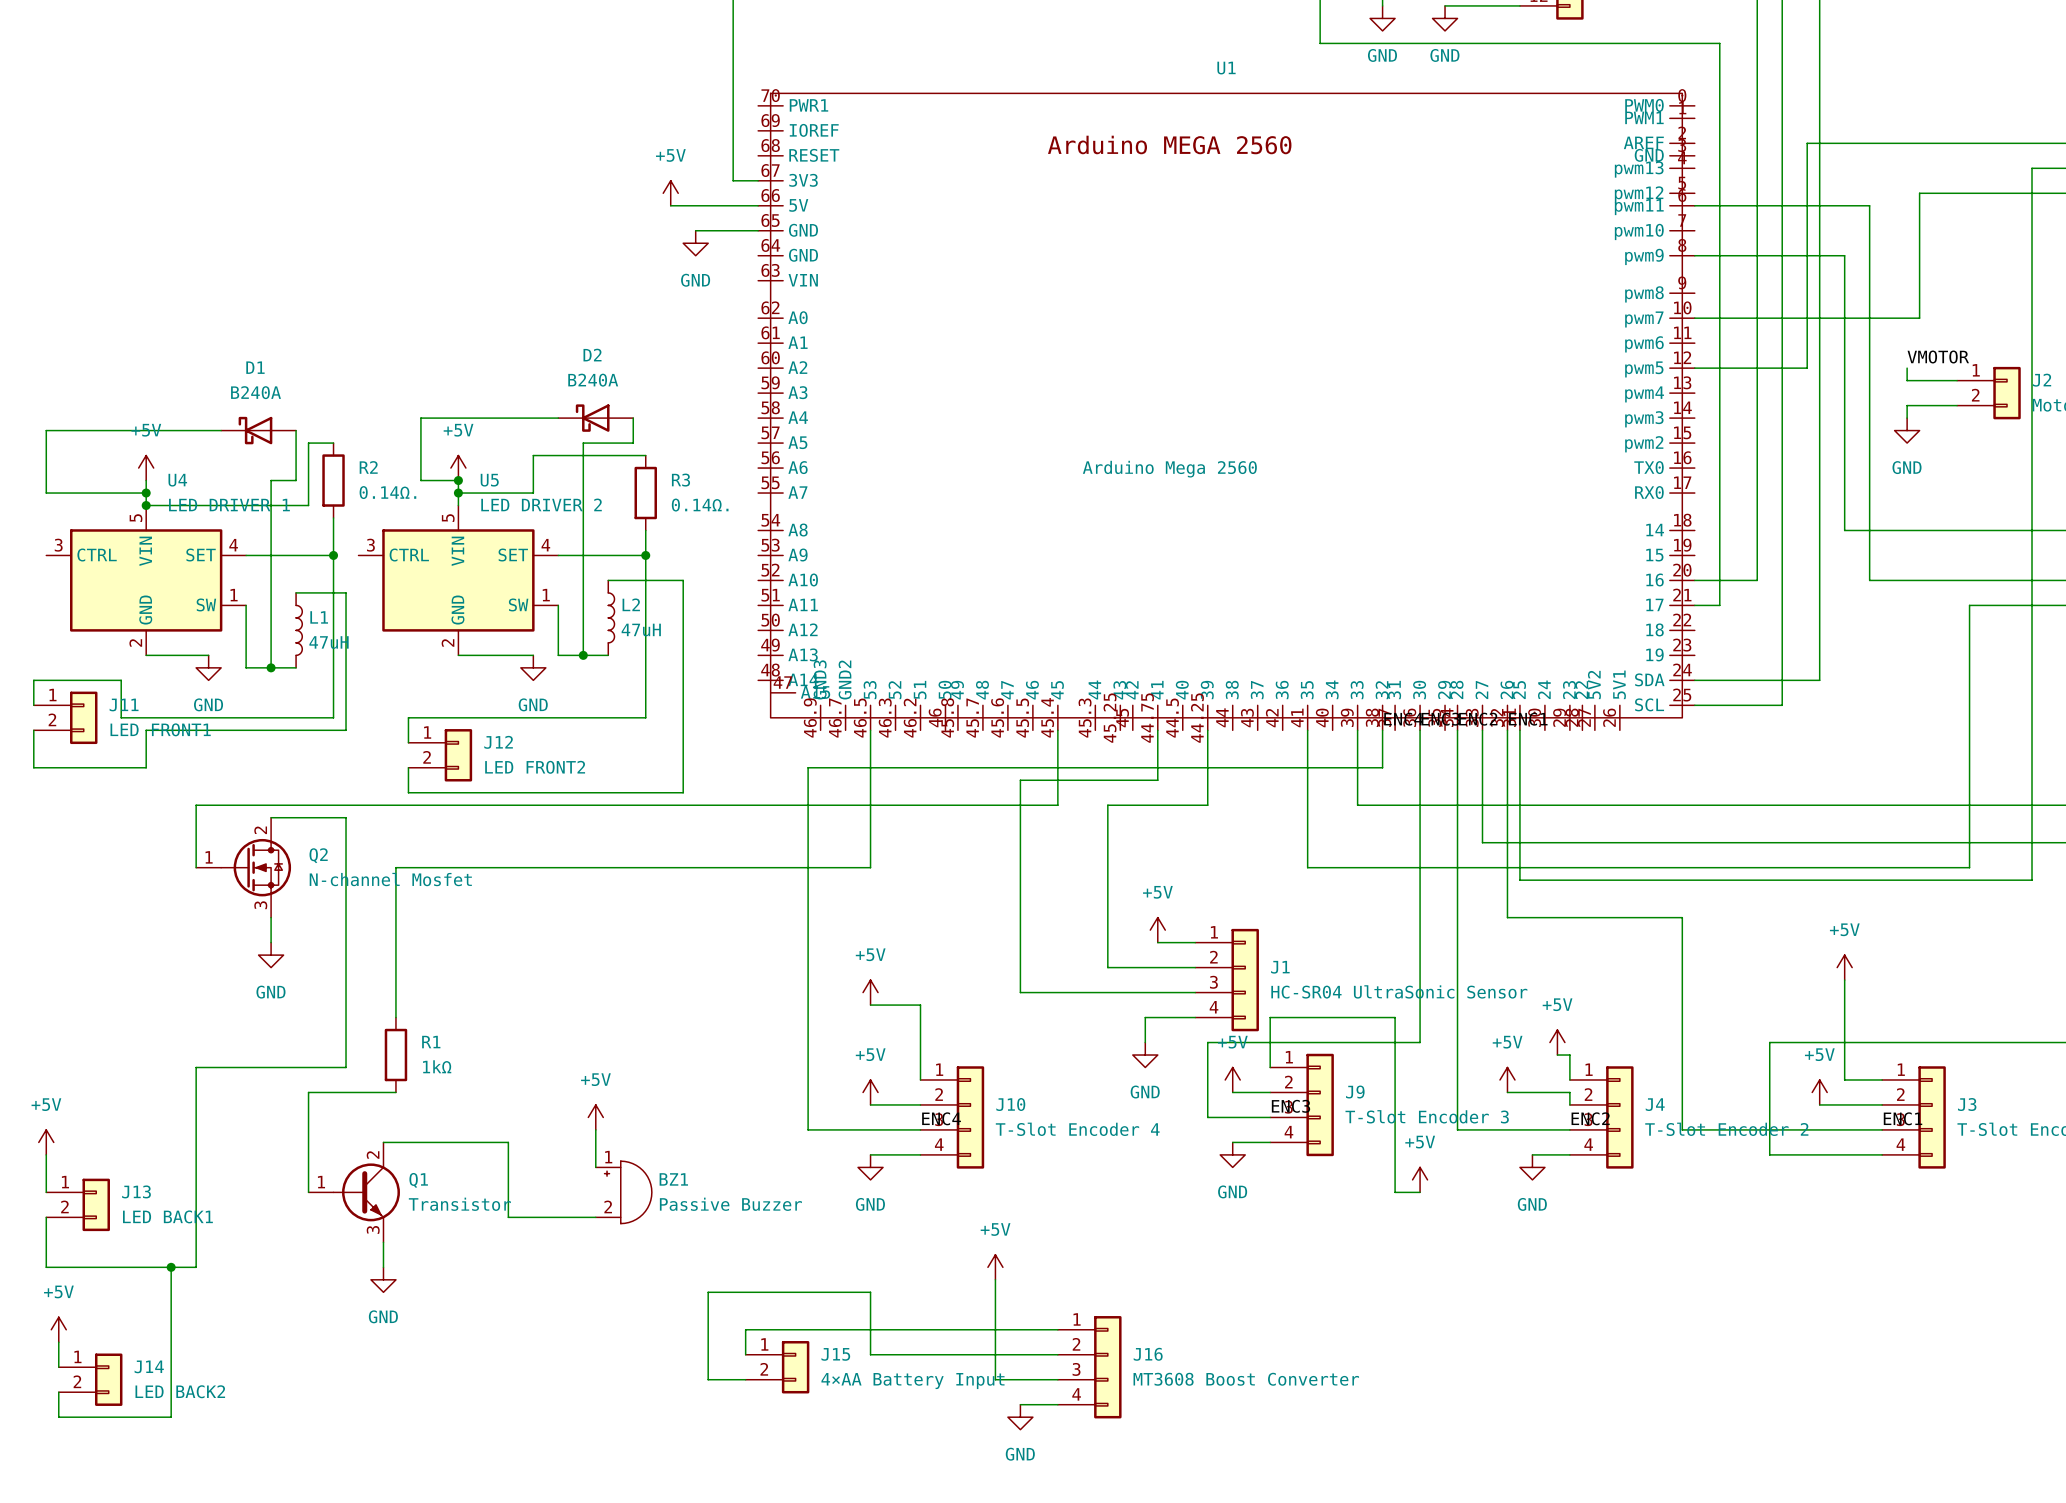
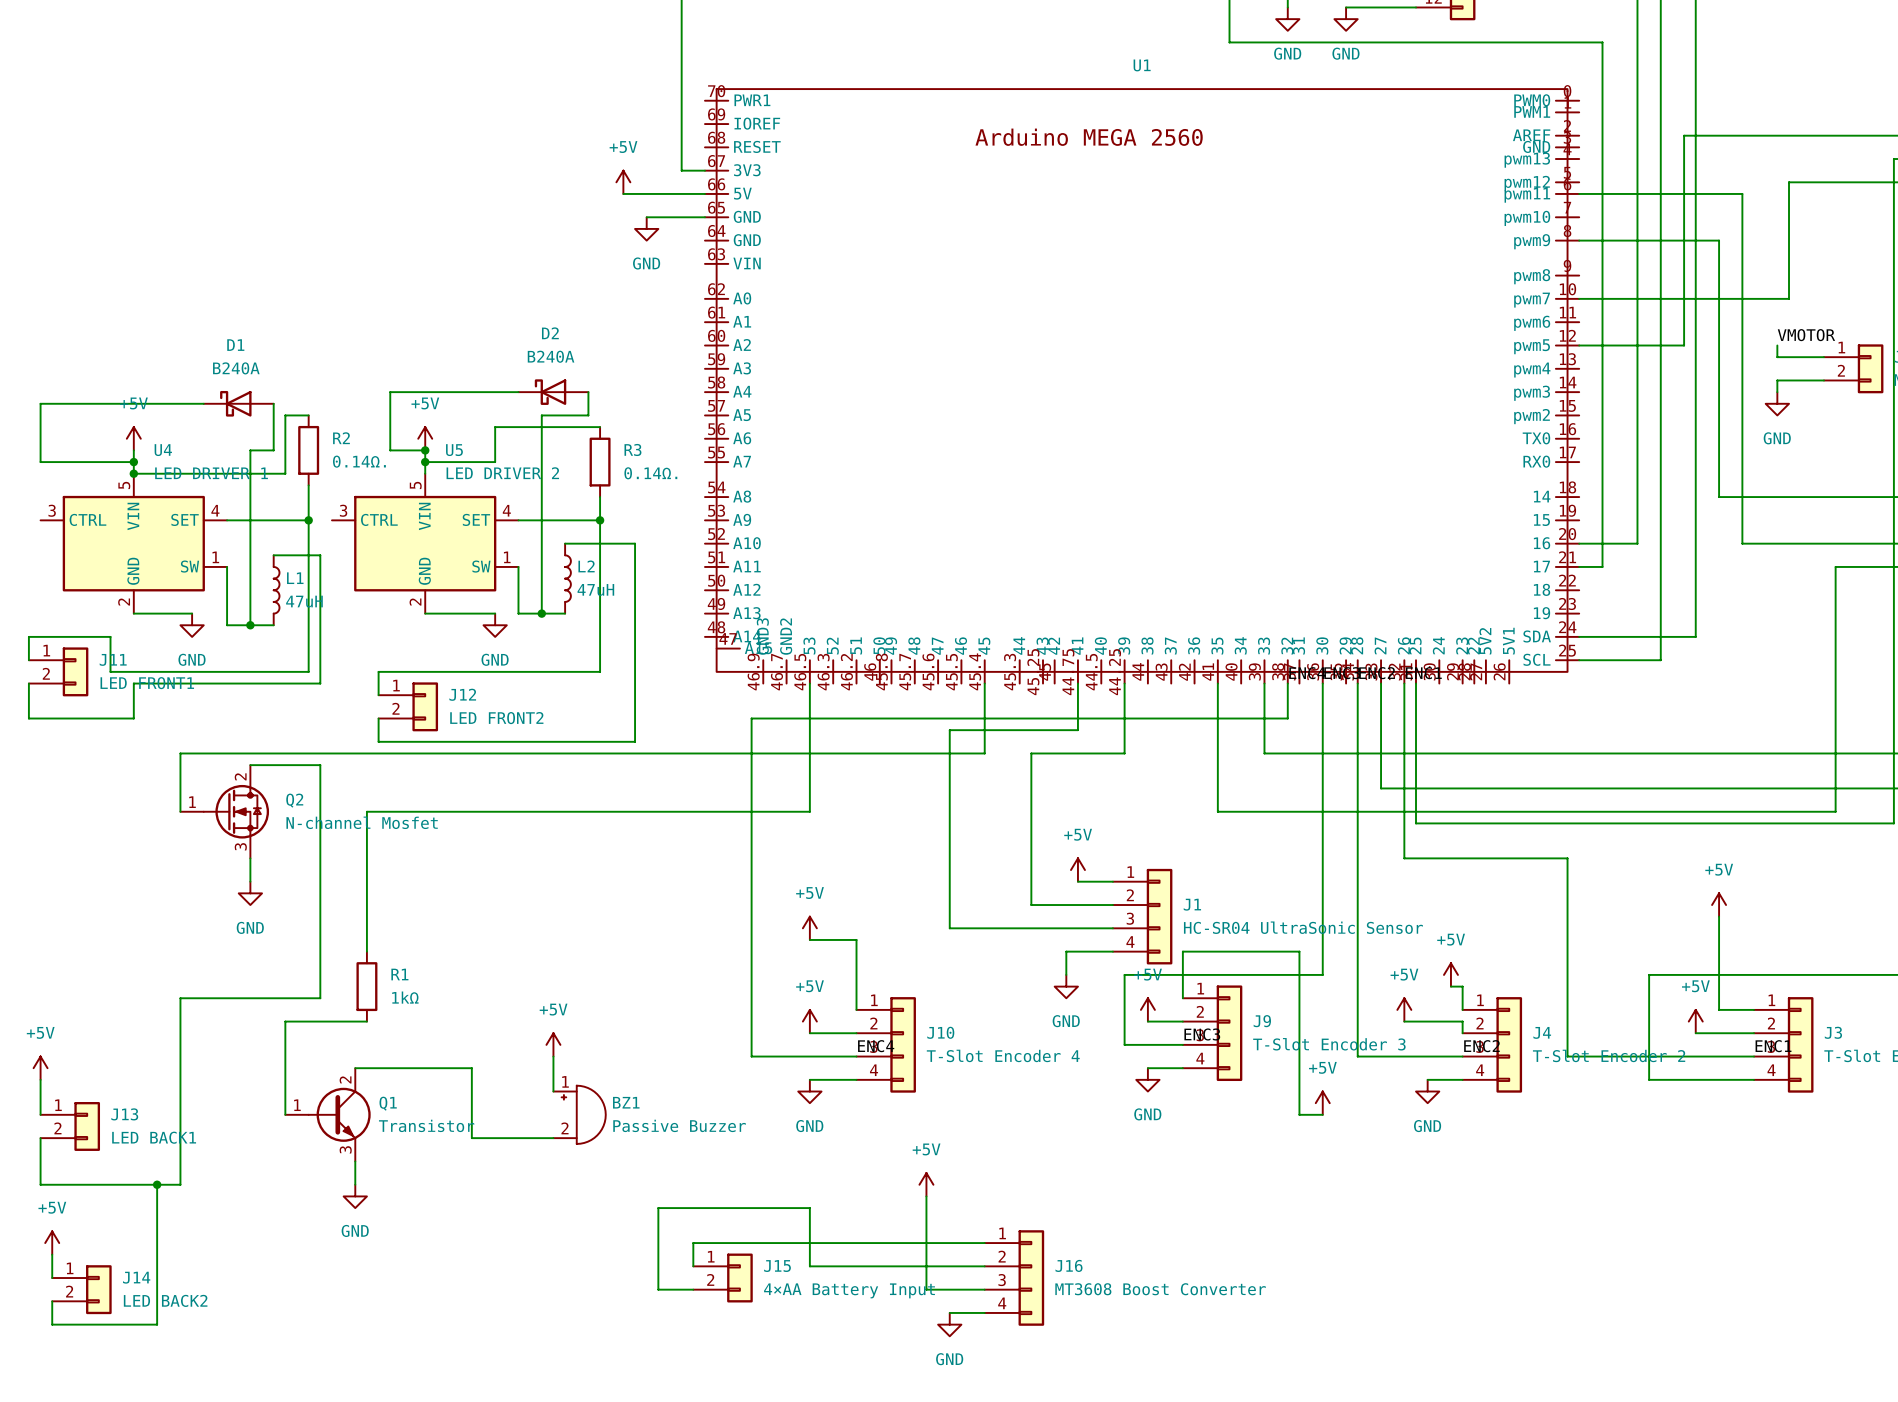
U1 value: Arduino Mega 2560 (1169, 469) -> none

